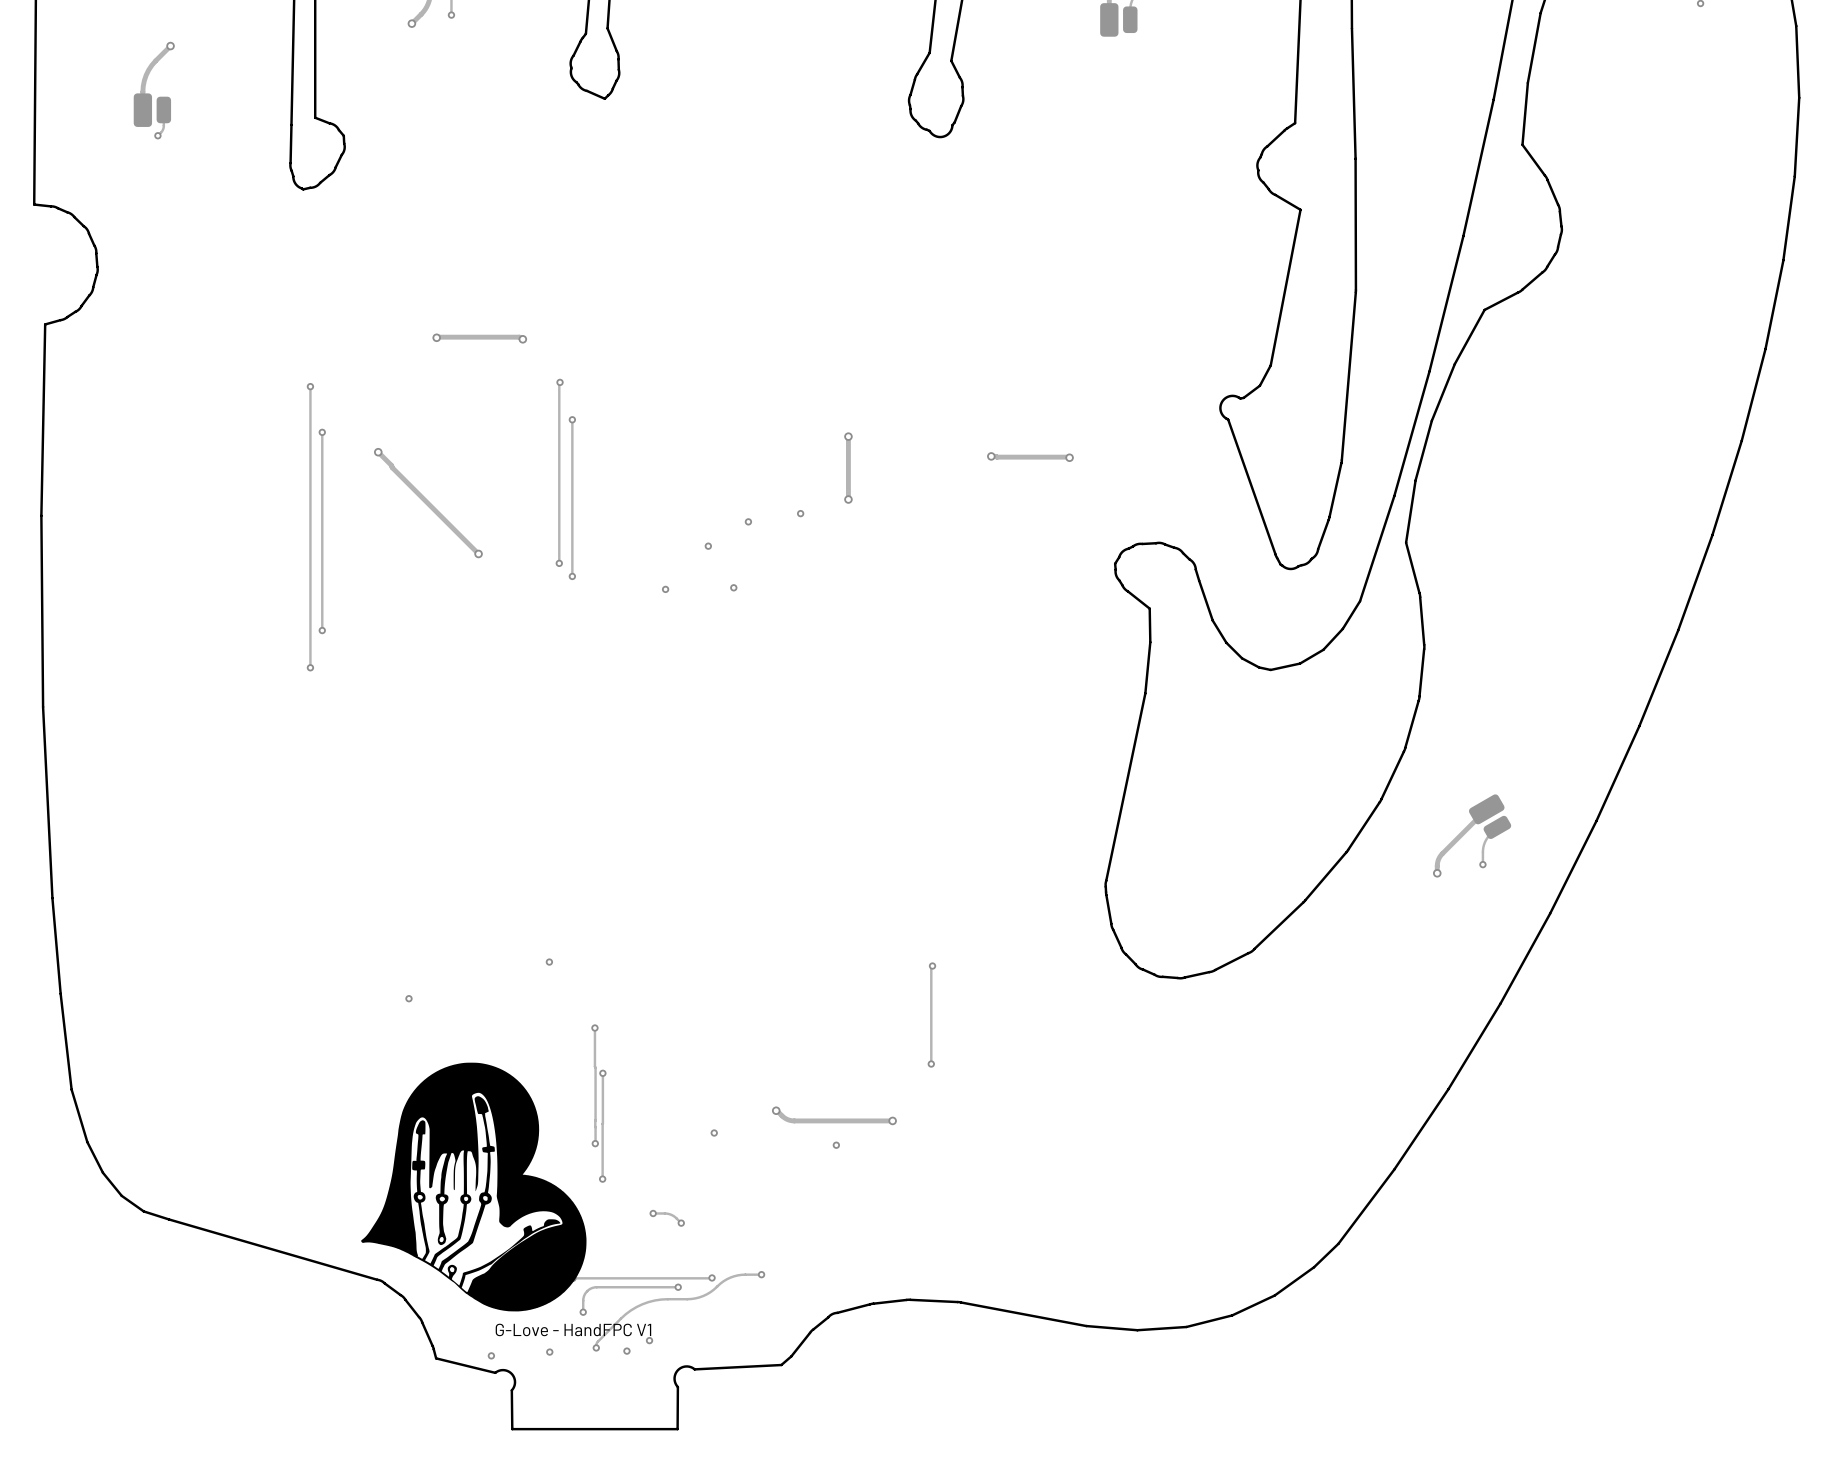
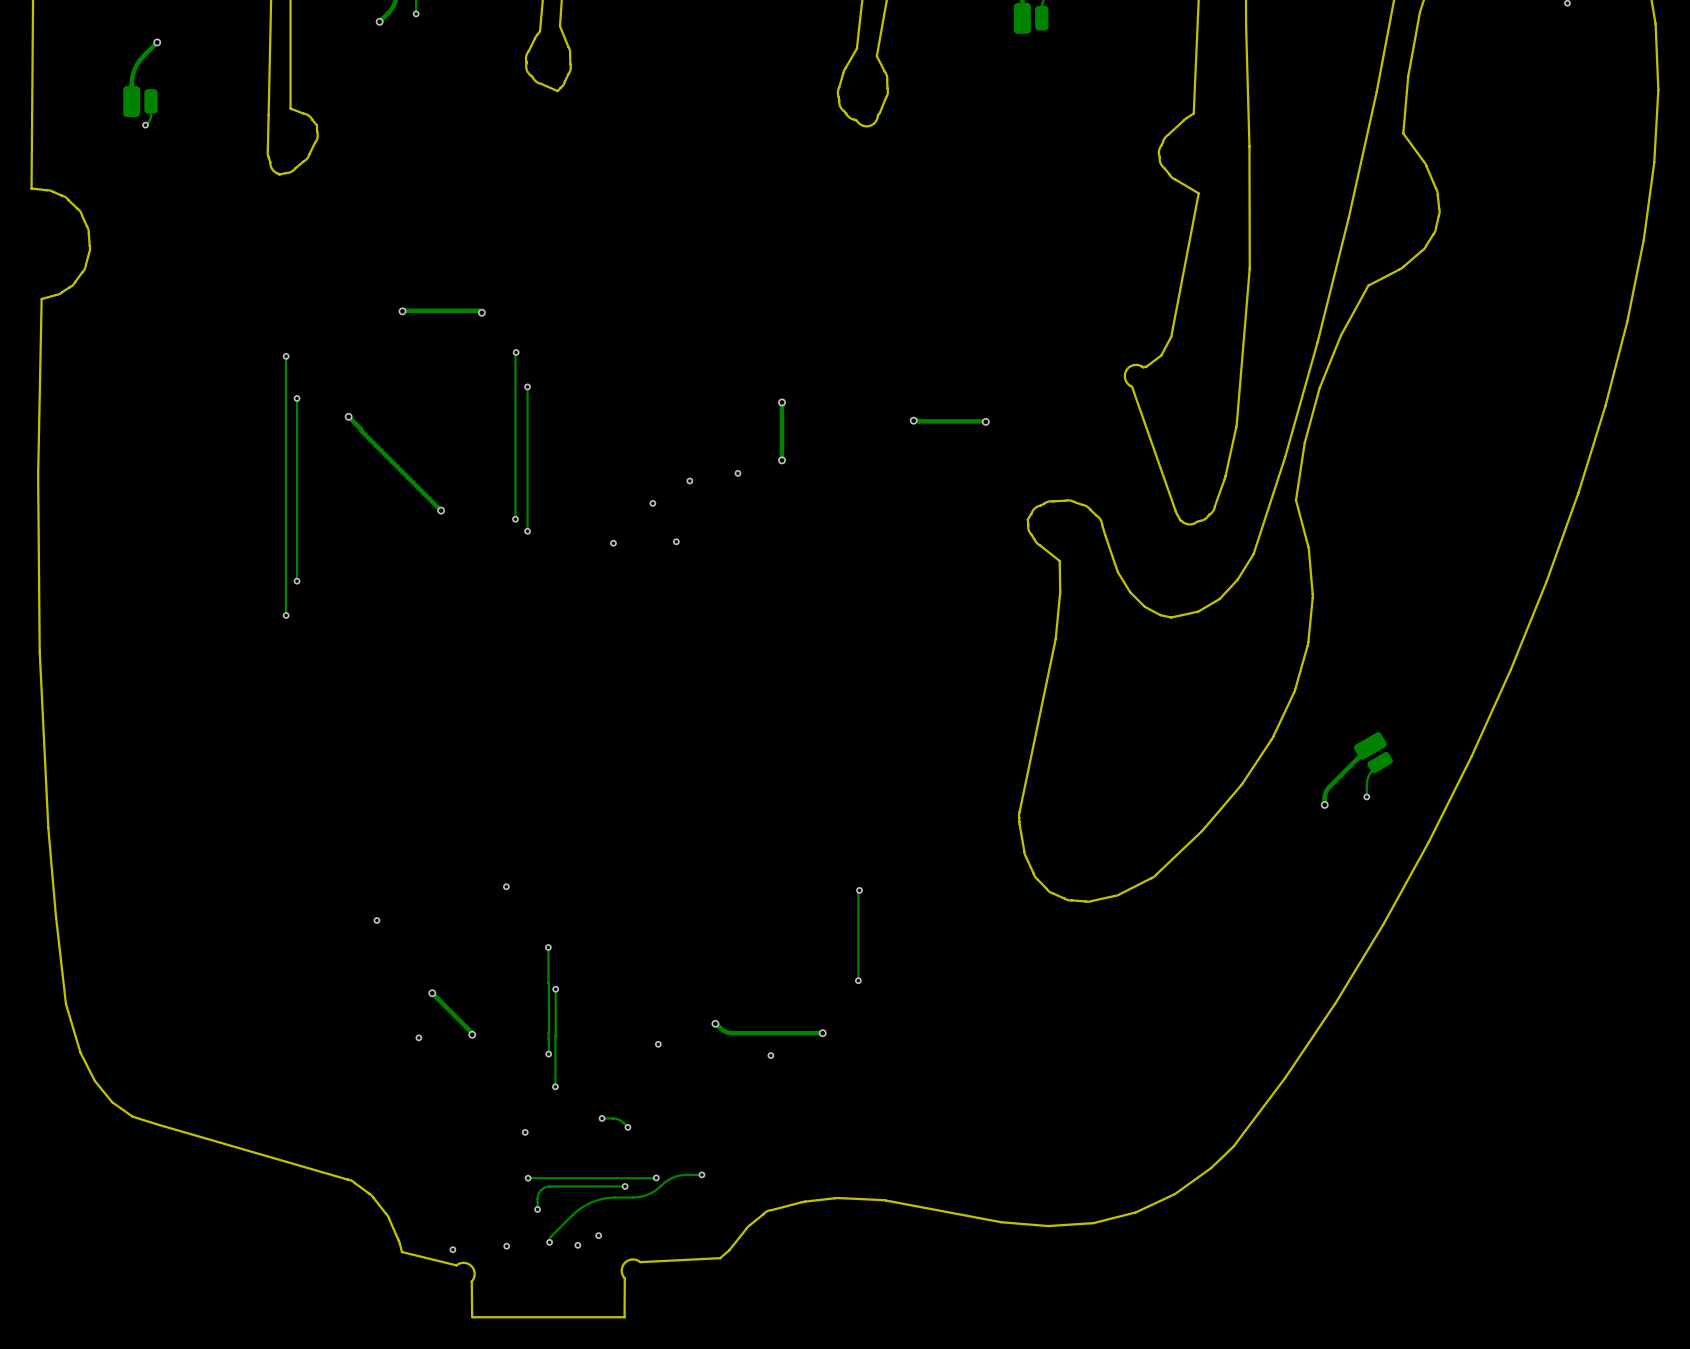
drawing: [361, 1062, 587, 1312] -> none
text: G-Love - HandFPC V1 (573, 1329) -> none

